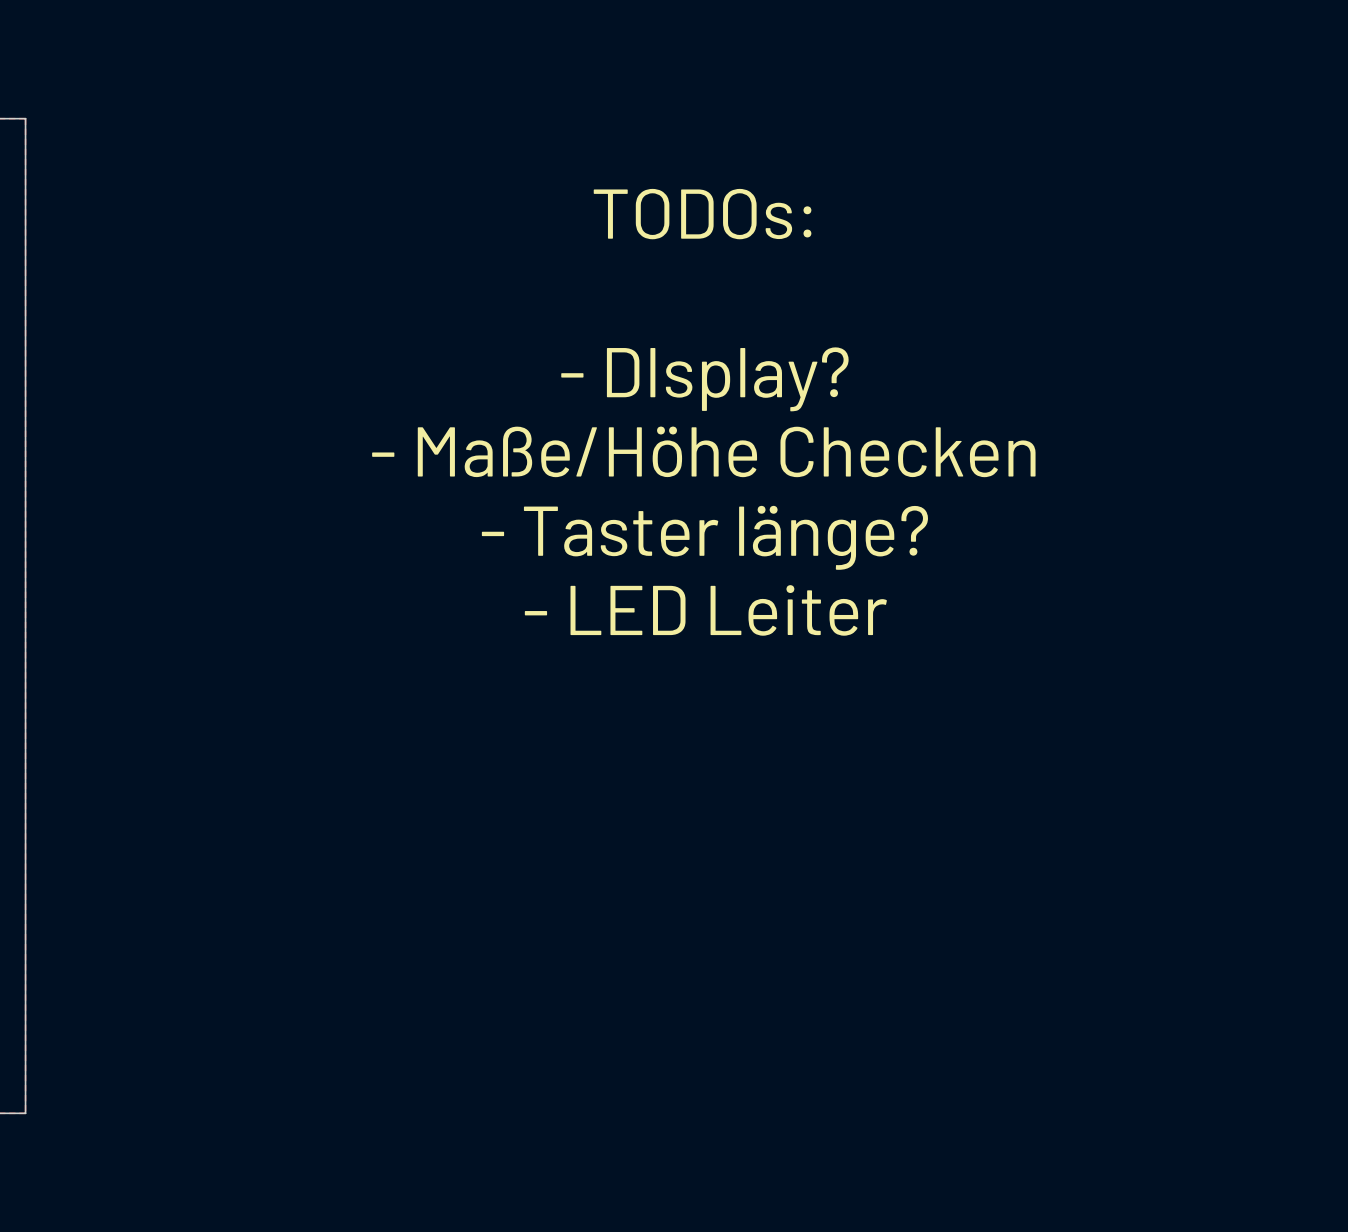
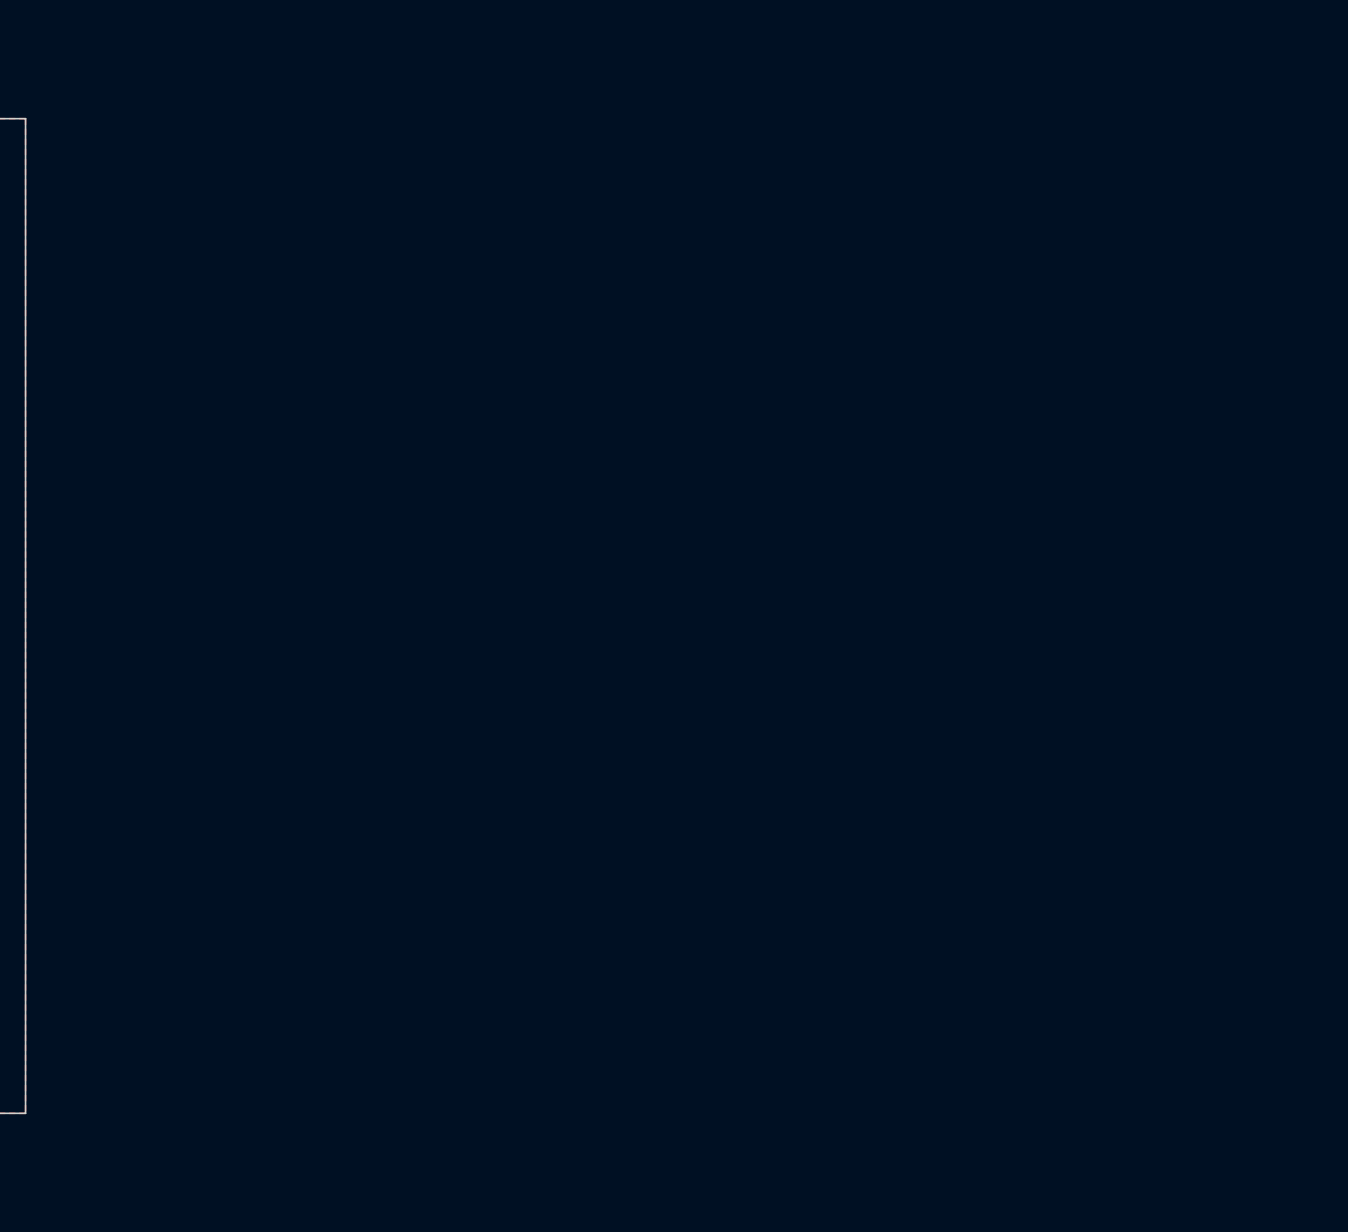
text: TODOs: (702, 214) -> none
text: - DIsplay? (704, 379) -> none
text: - Maße/Höhe Checken (703, 451) -> none
text: - Taster länge? (704, 537) -> none
text: - LED Leiter (705, 610) -> none

